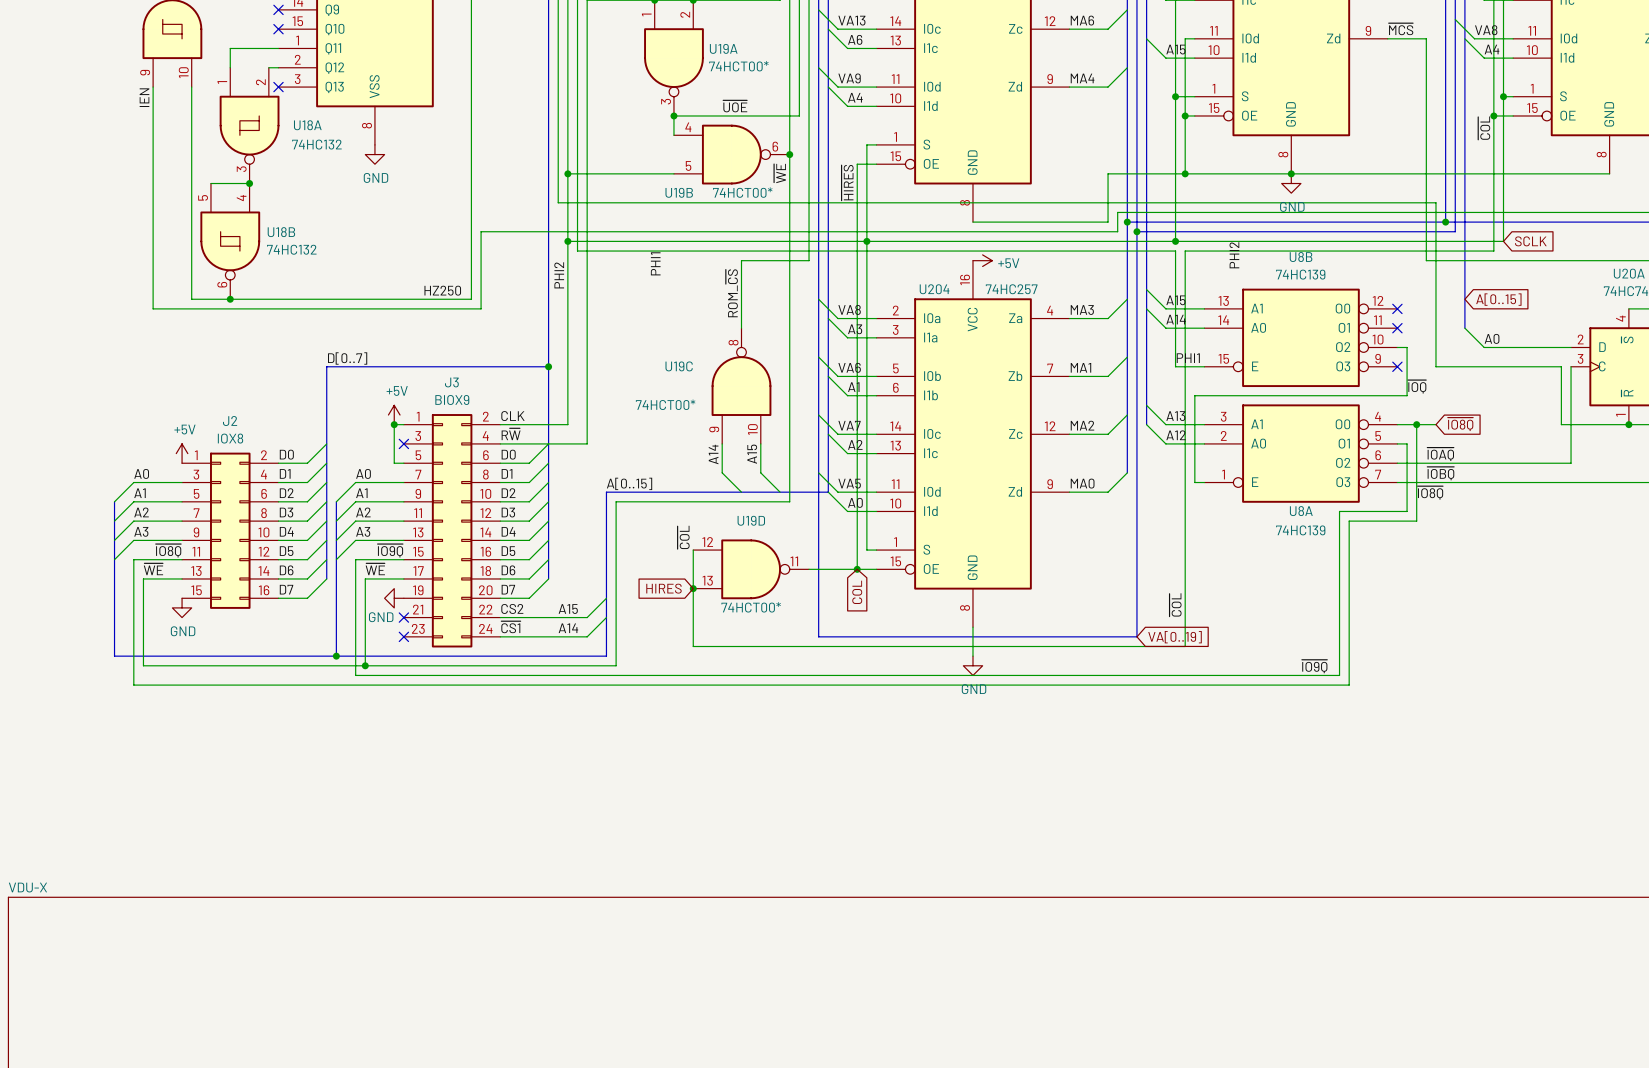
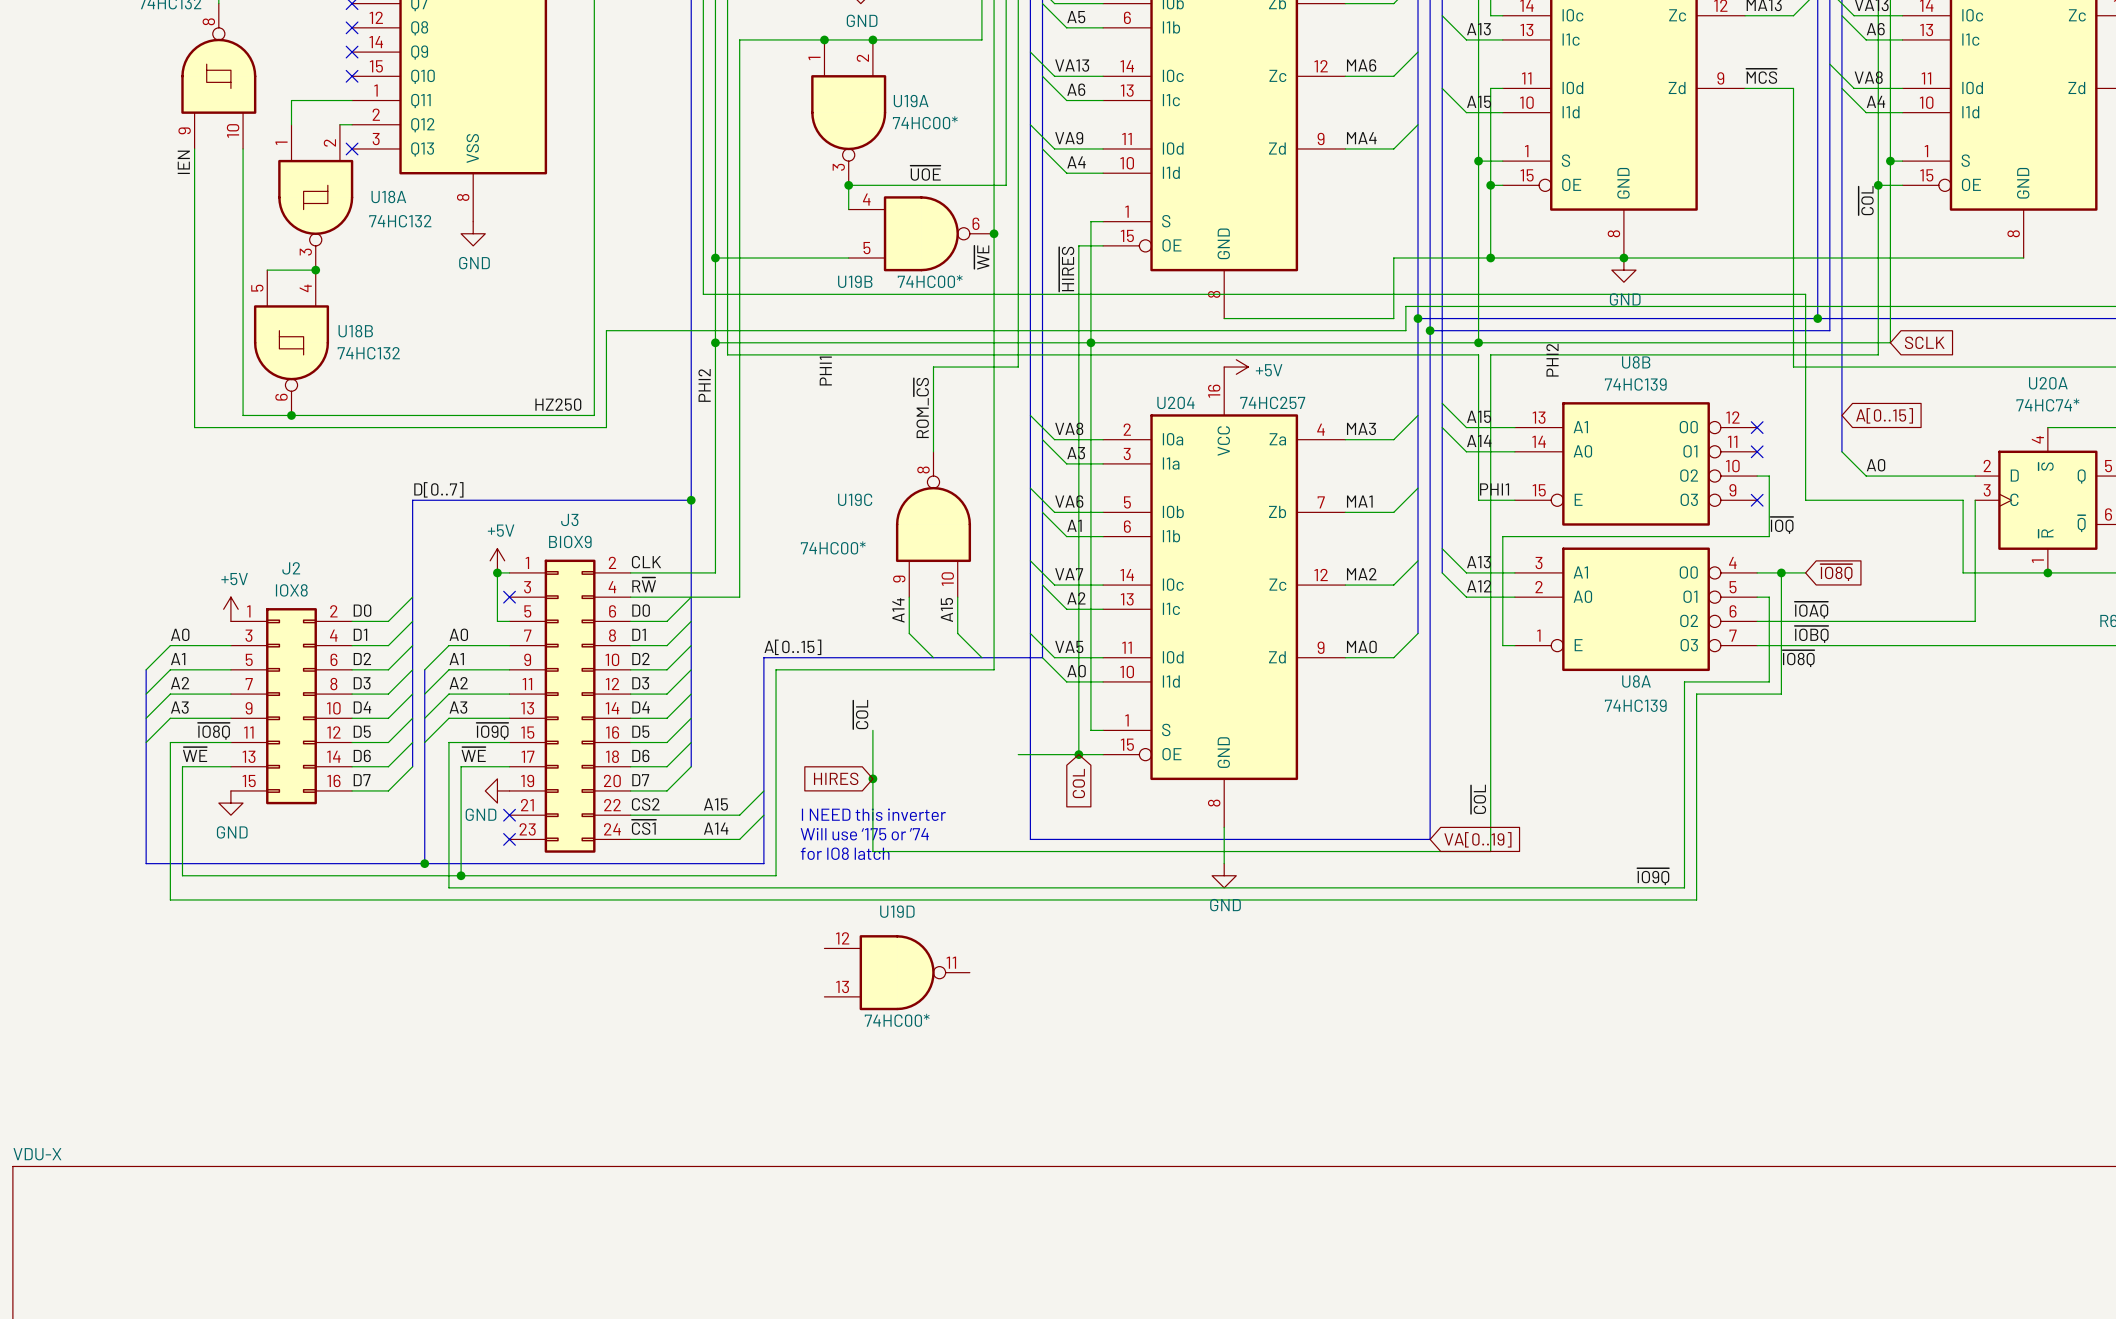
U19A value: 74HCT00* (738, 66) -> 74HC00* (925, 122)
U19B value: 74HCT00* (742, 192) -> 74HC00* (930, 281)
U19C value: 74HCT00* (665, 404) -> 74HC00* (833, 547)
U19D position: (751, 569) -> (897, 972)
U19D value: 74HCT00* (751, 607) -> 74HC00* (897, 1020)
text: none -> I NEED this inverter (873, 814)
text: none -> Will use ‘175 or ’74 (864, 834)
text: none -> for IO8 latch (845, 853)

